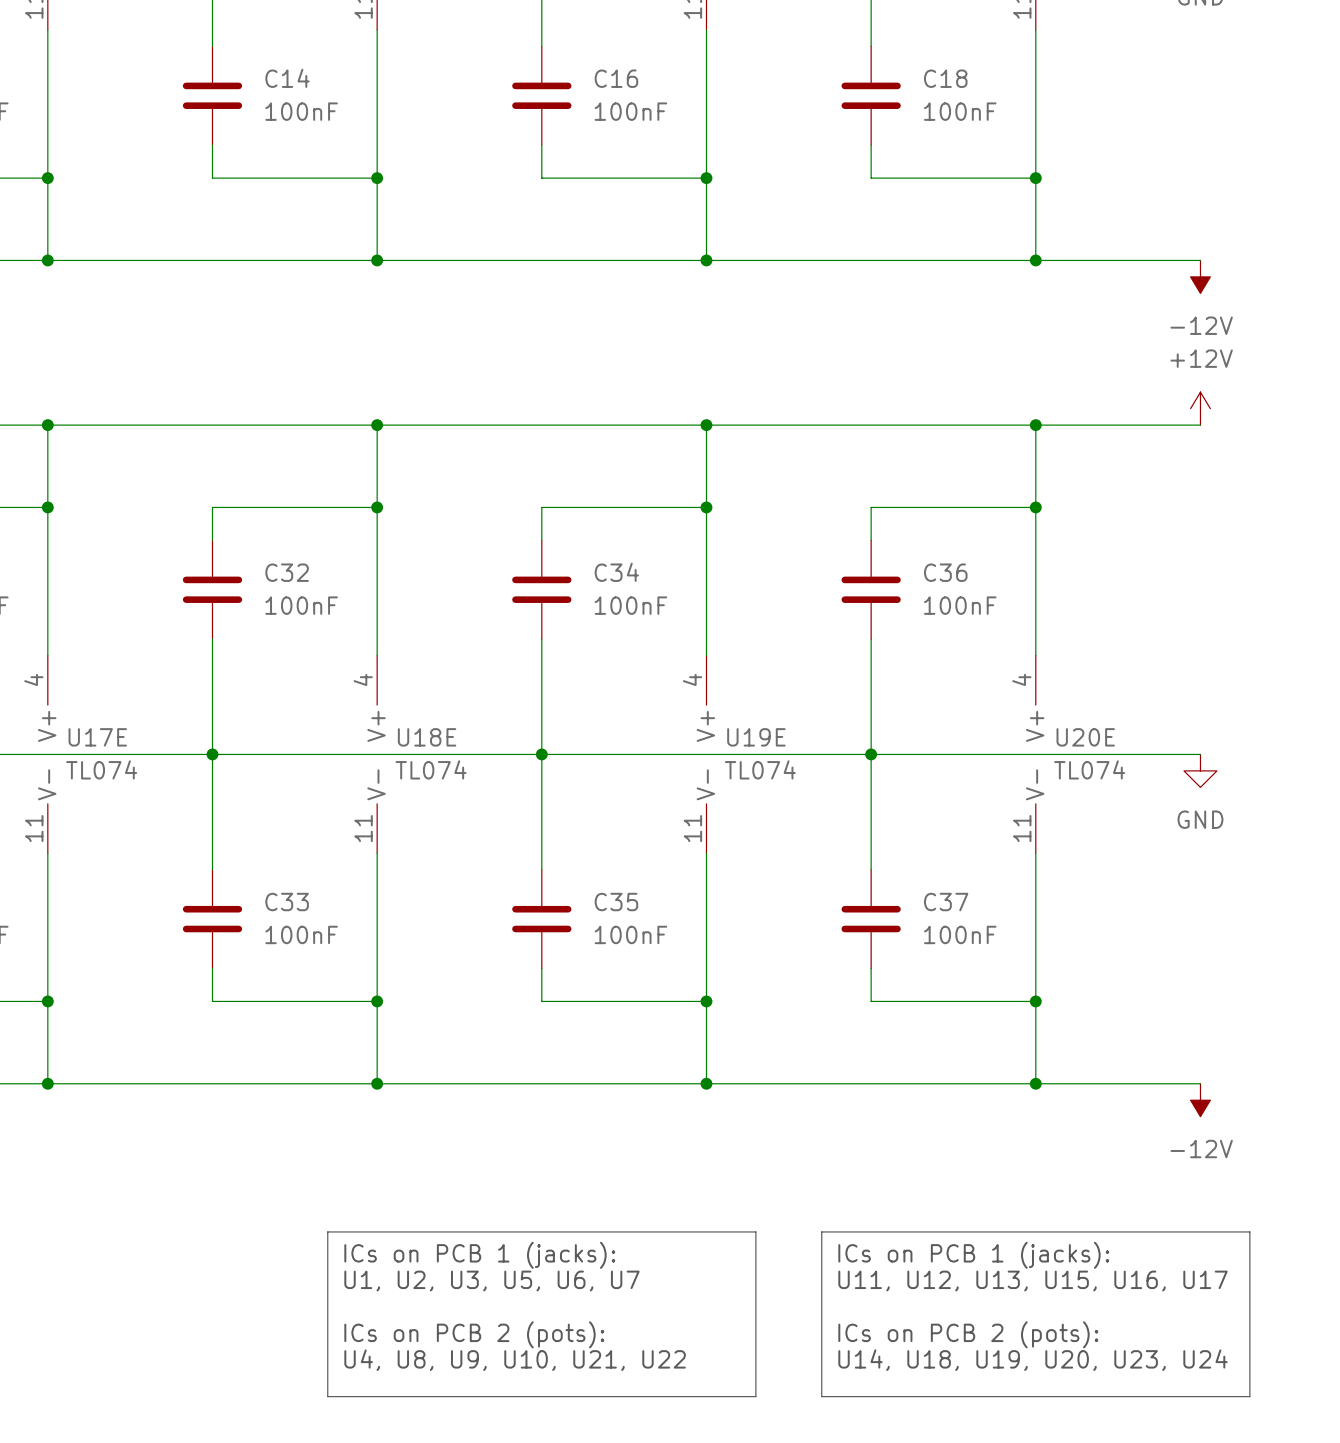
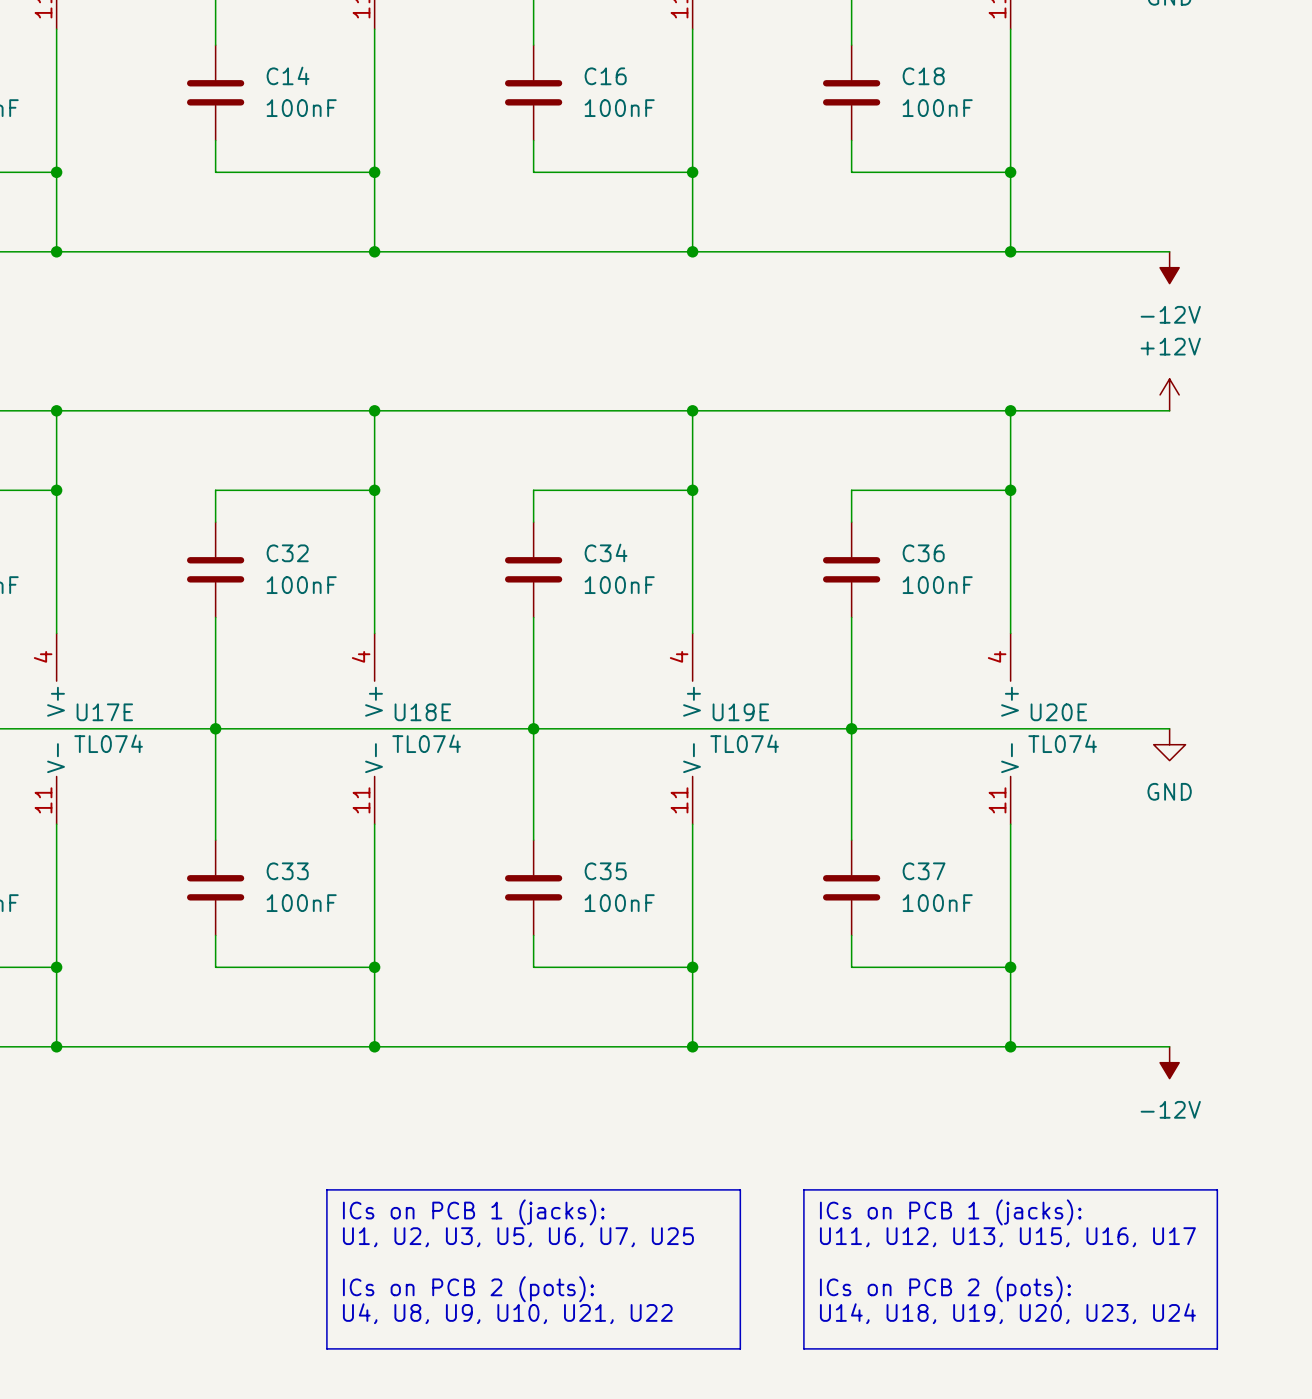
text: U1, U2, U3, U5, U6, U7 (491, 1281) -> U1, U2, U3, U5, U6, U7, U25 (518, 1237)

